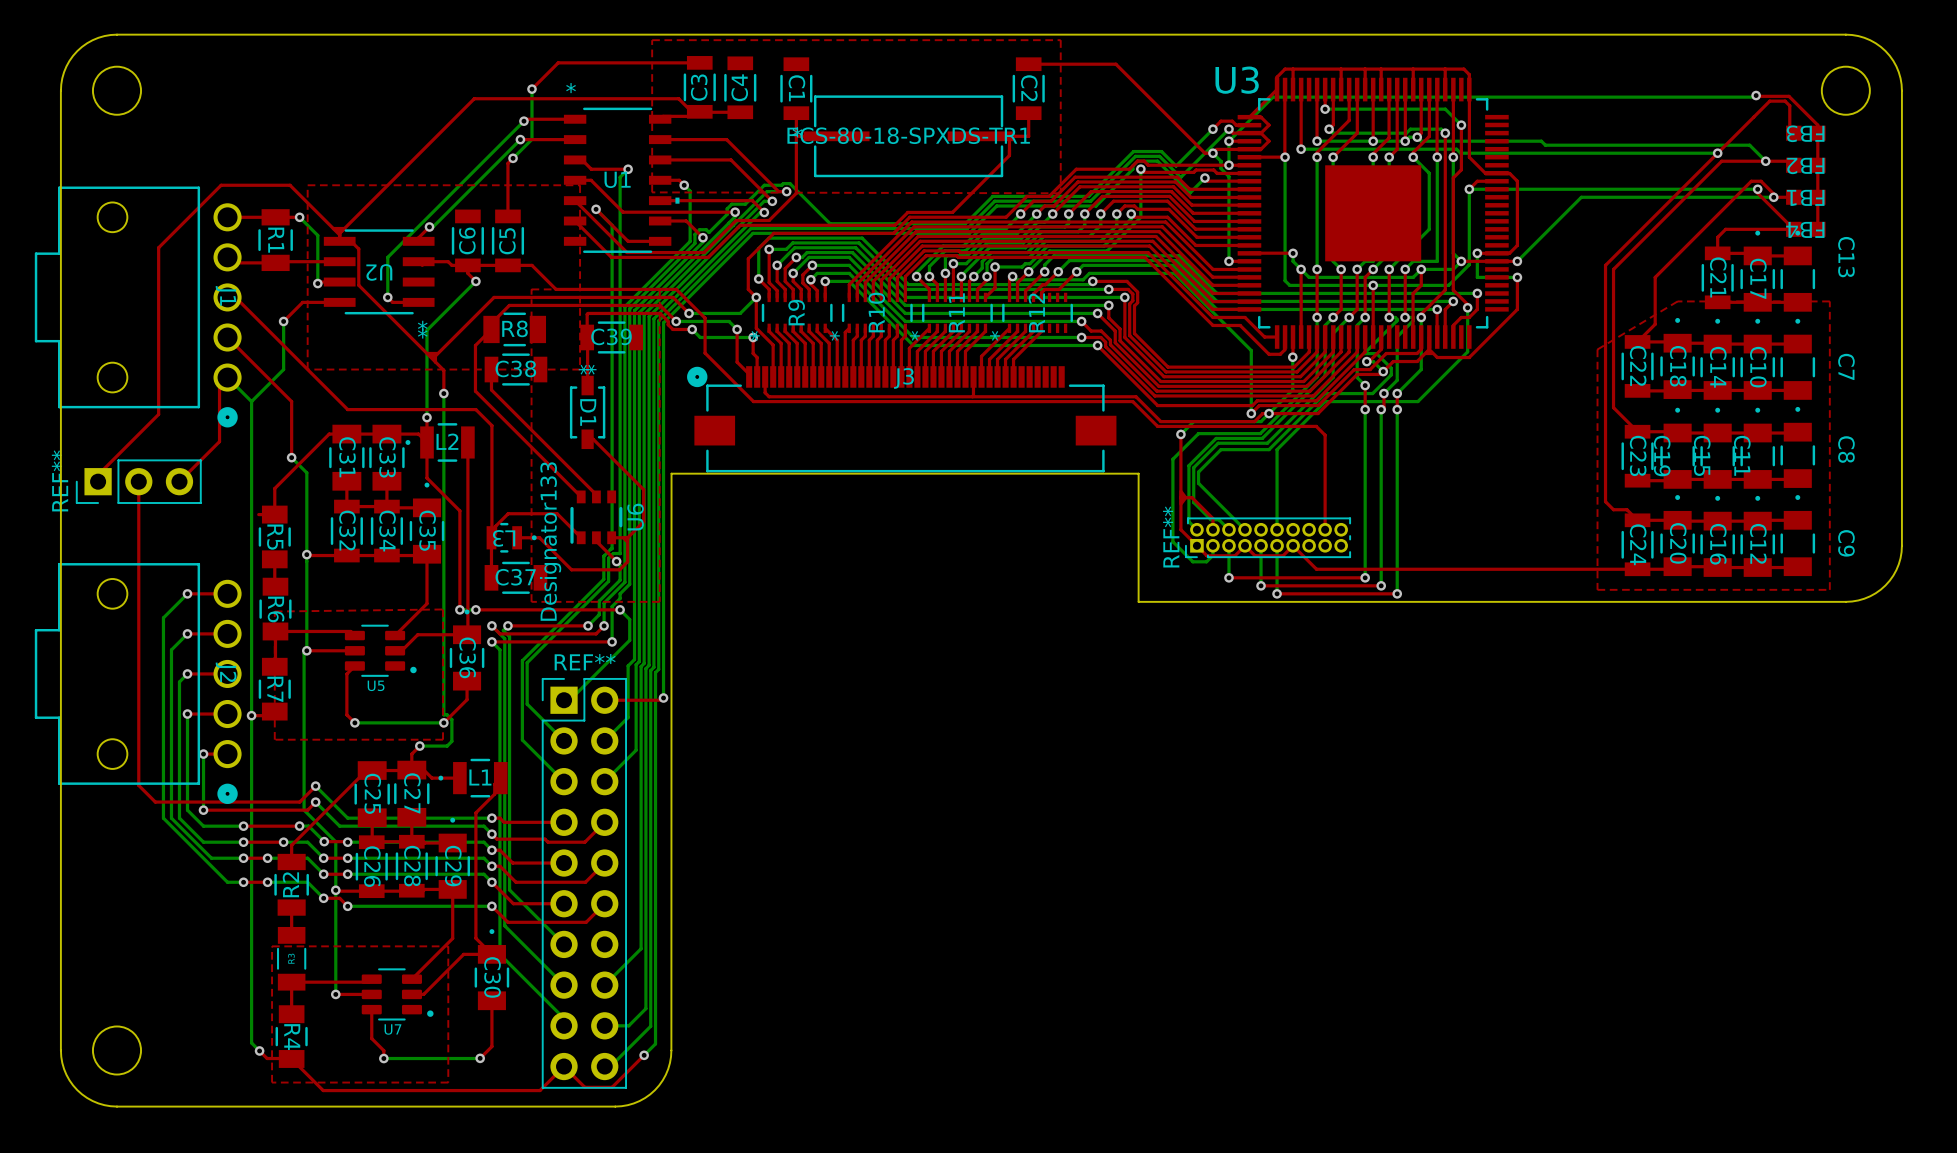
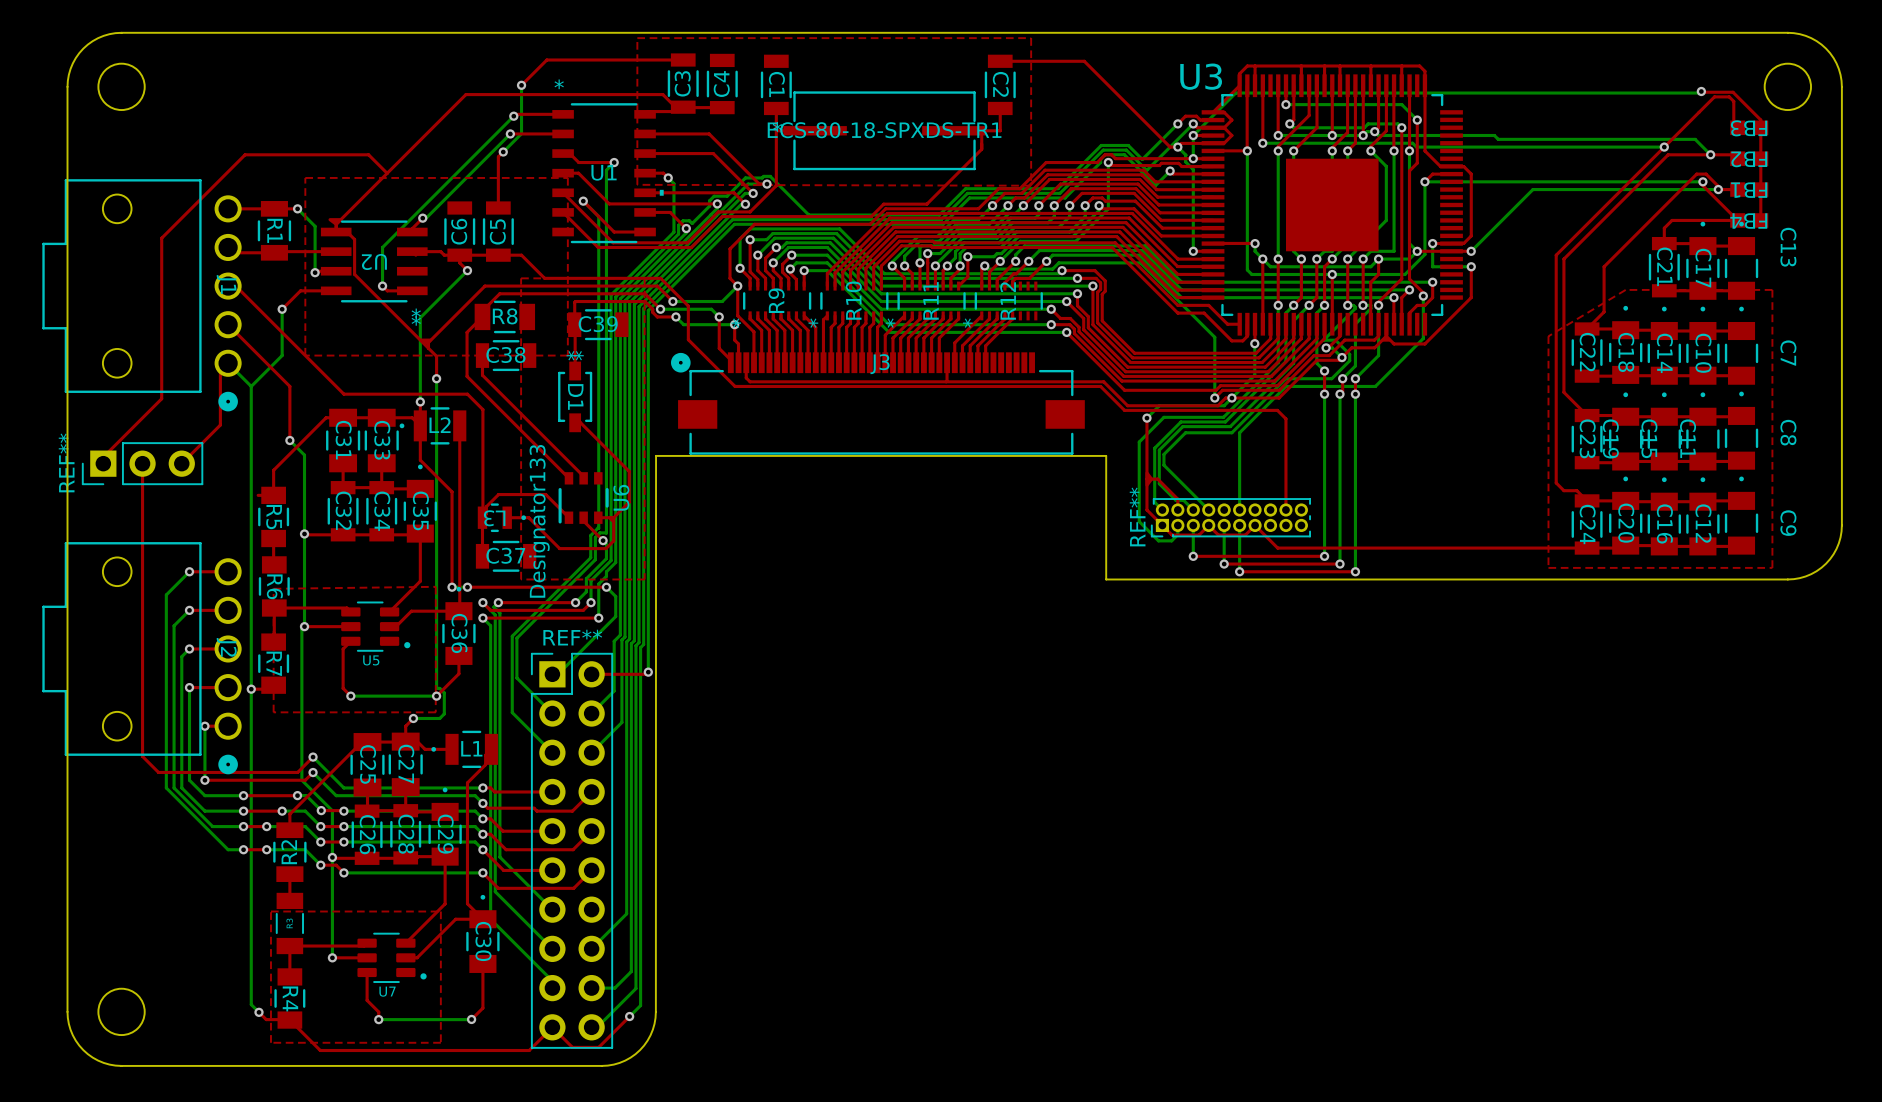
top track: (221, 185) (290, 185) (339, 234) -> (221, 177) (245, 154) (368, 154) (387, 173)

